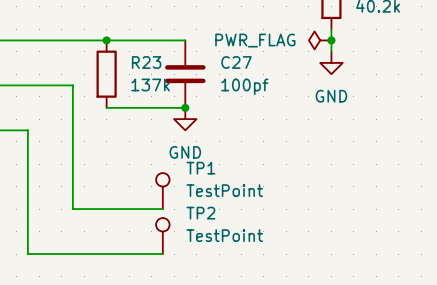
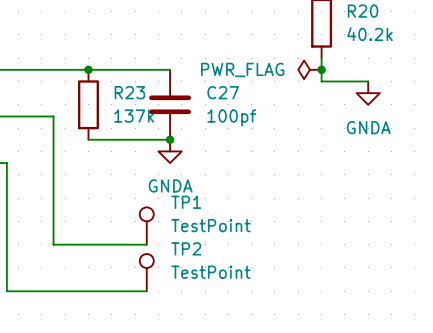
wire: none -> (321, 81) (368, 81)
power symbol: GND (331, 62) -> none
power symbol: none -> GNDA (368, 93)
power symbol: GND (185, 119) -> GNDA (170, 151)

